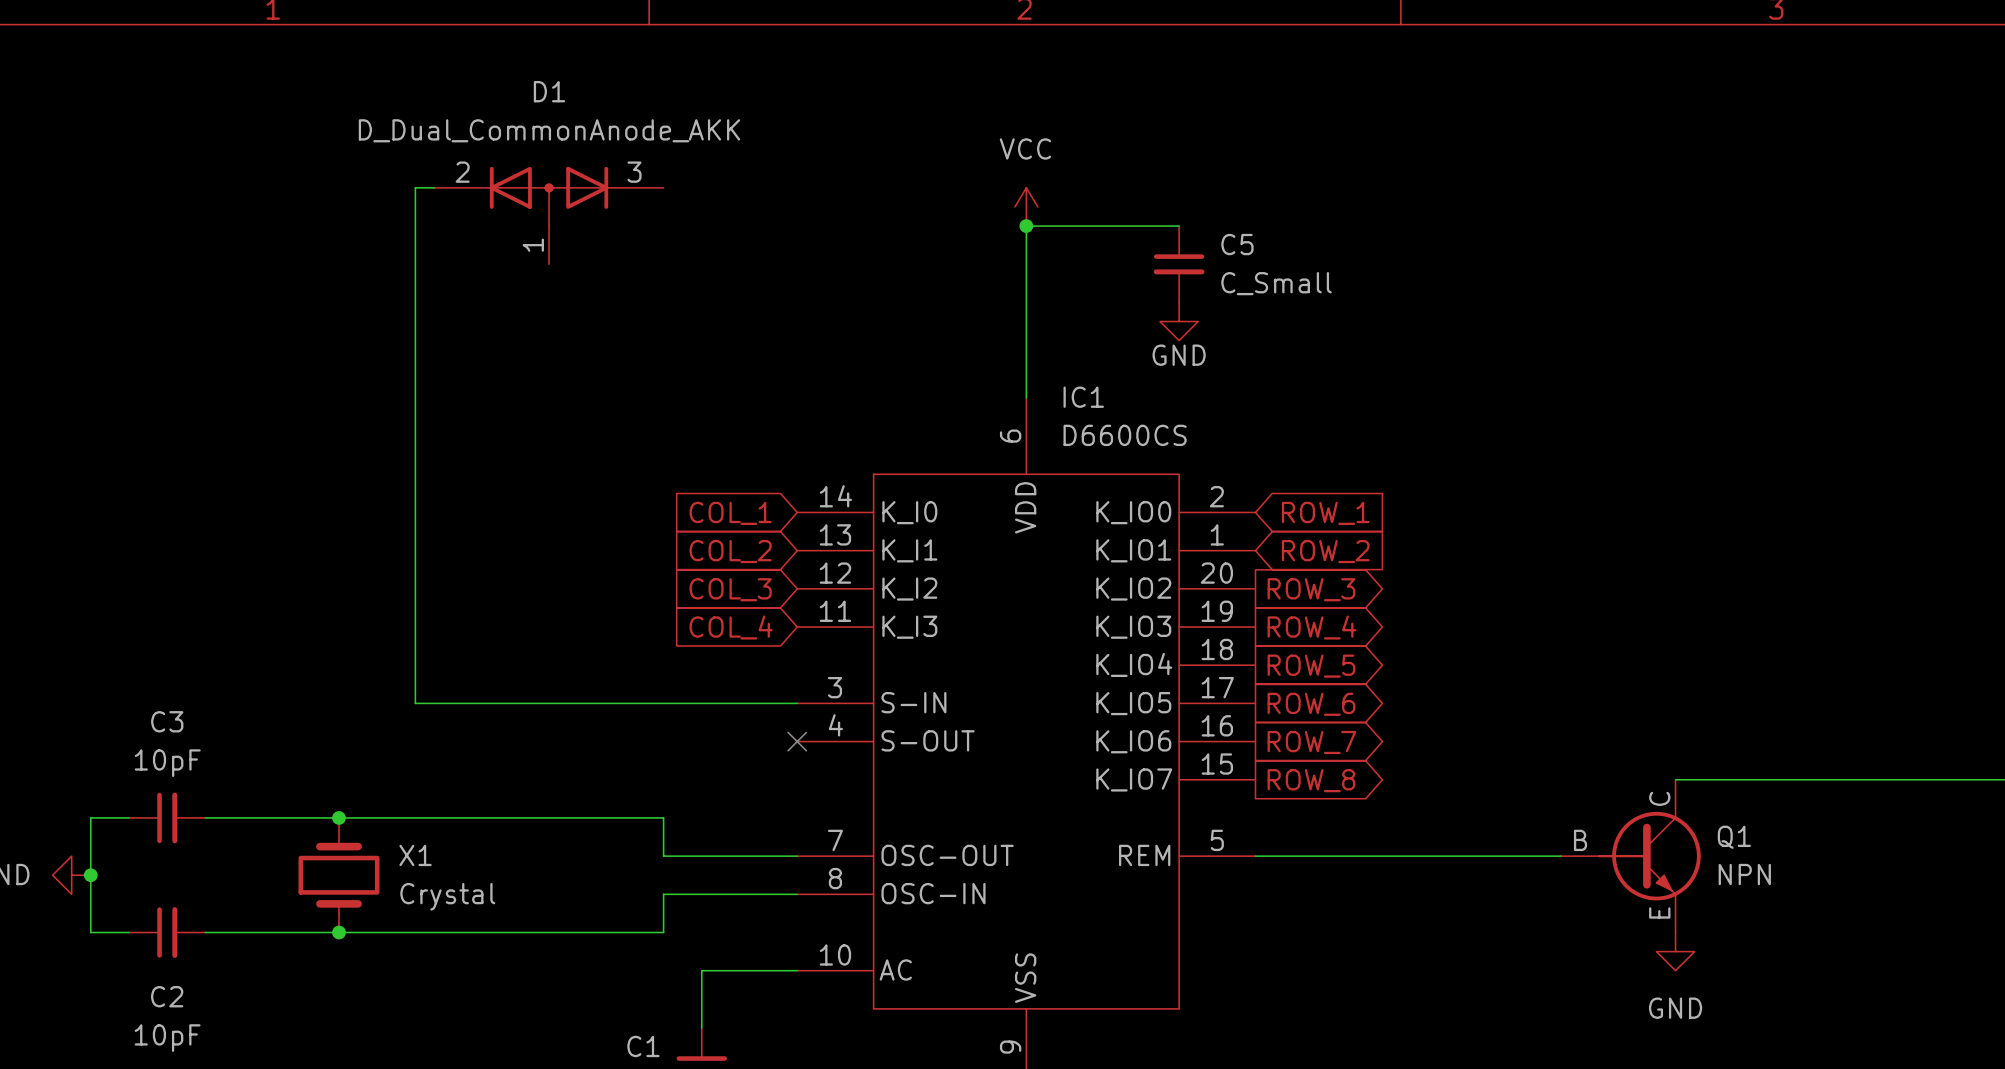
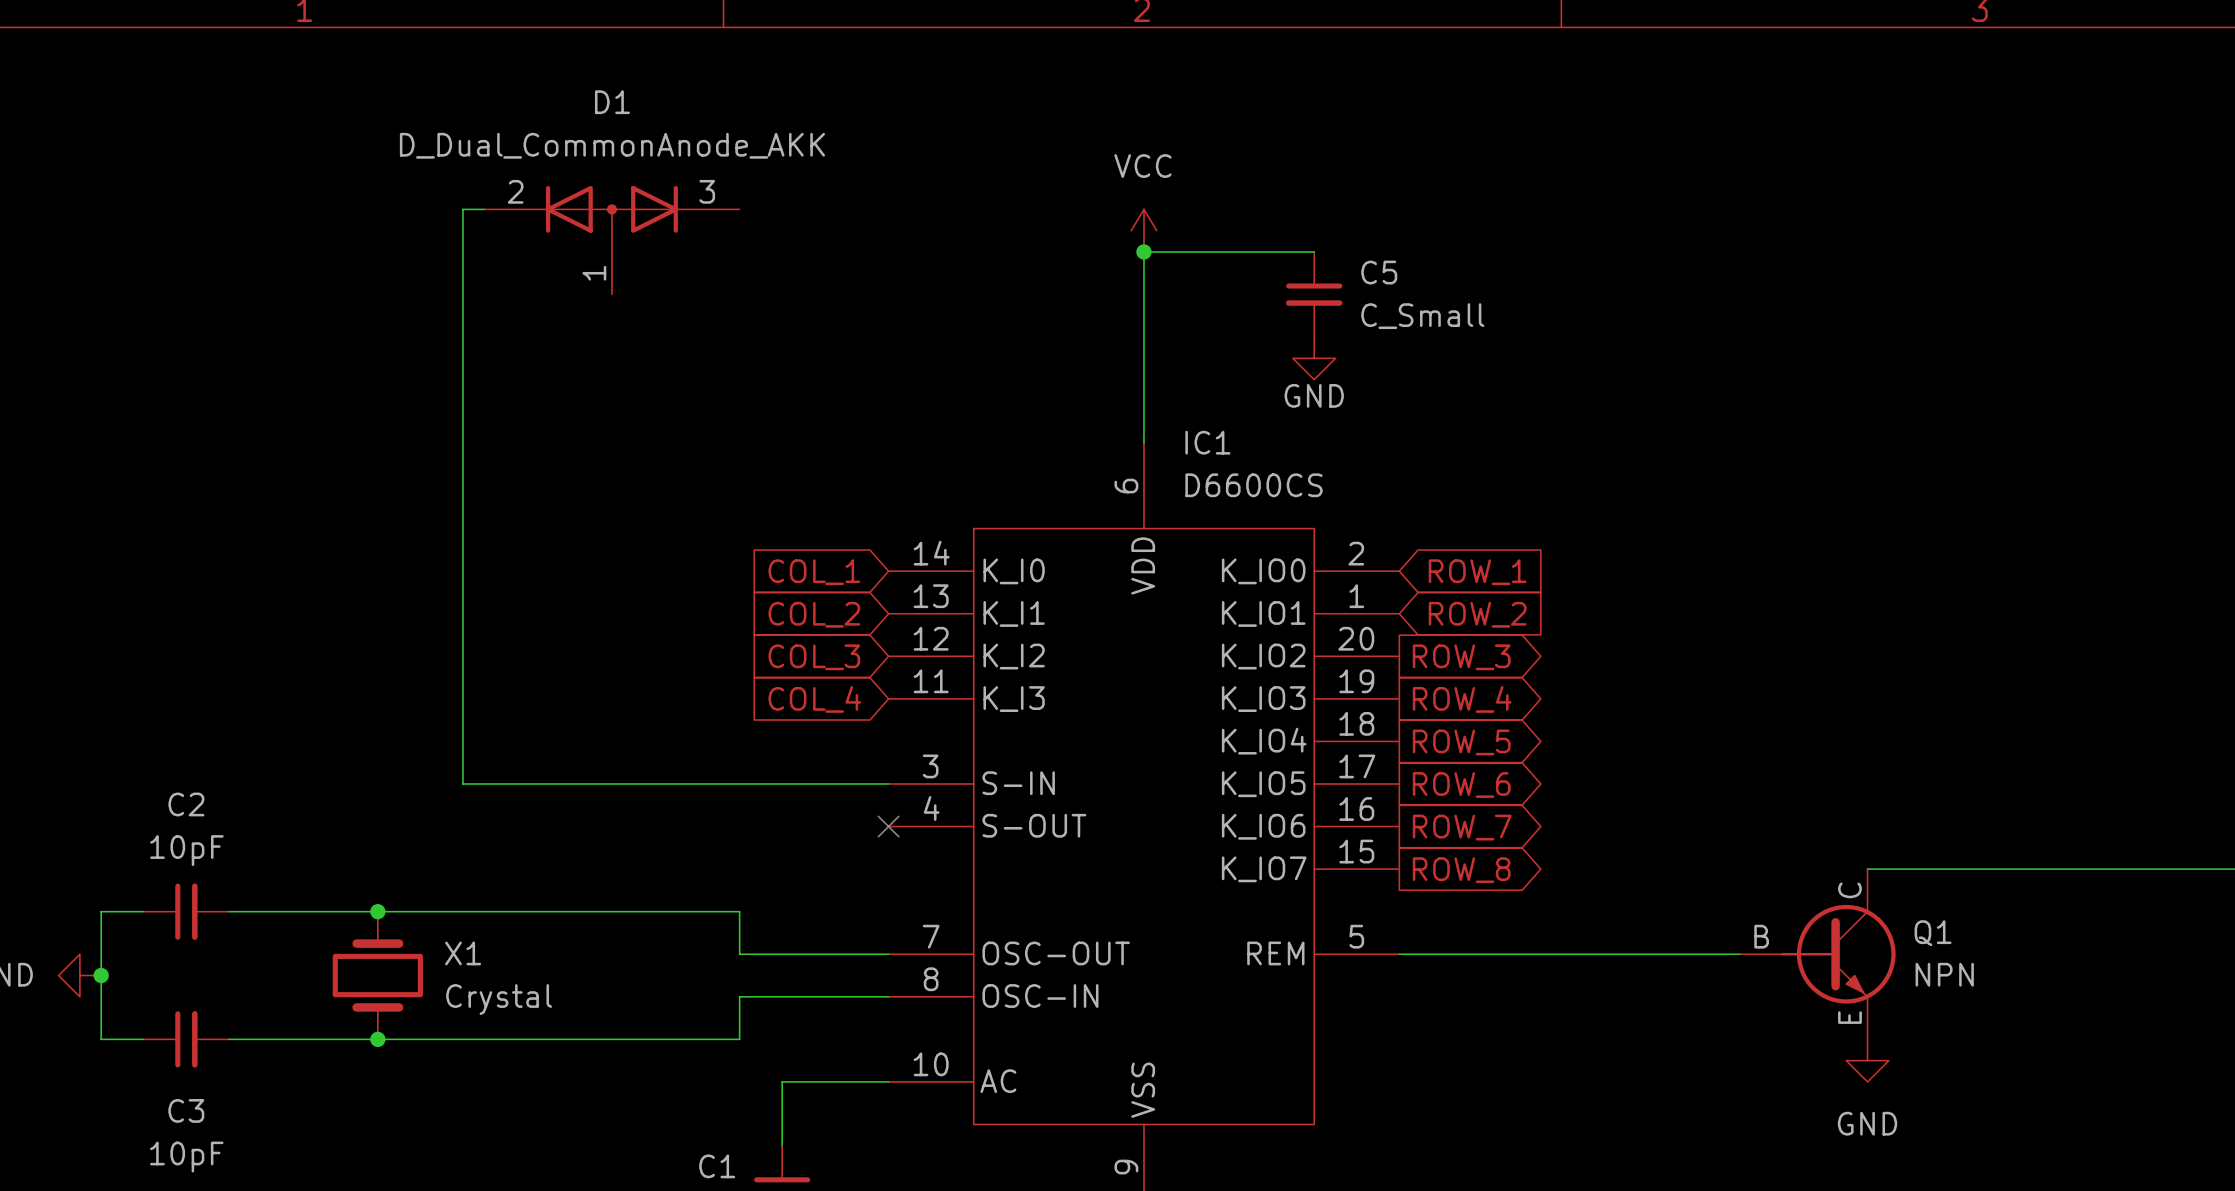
C3 name: C3 (167, 721) -> C2 (186, 804)
C2 name: C2 (167, 996) -> C3 (186, 1110)

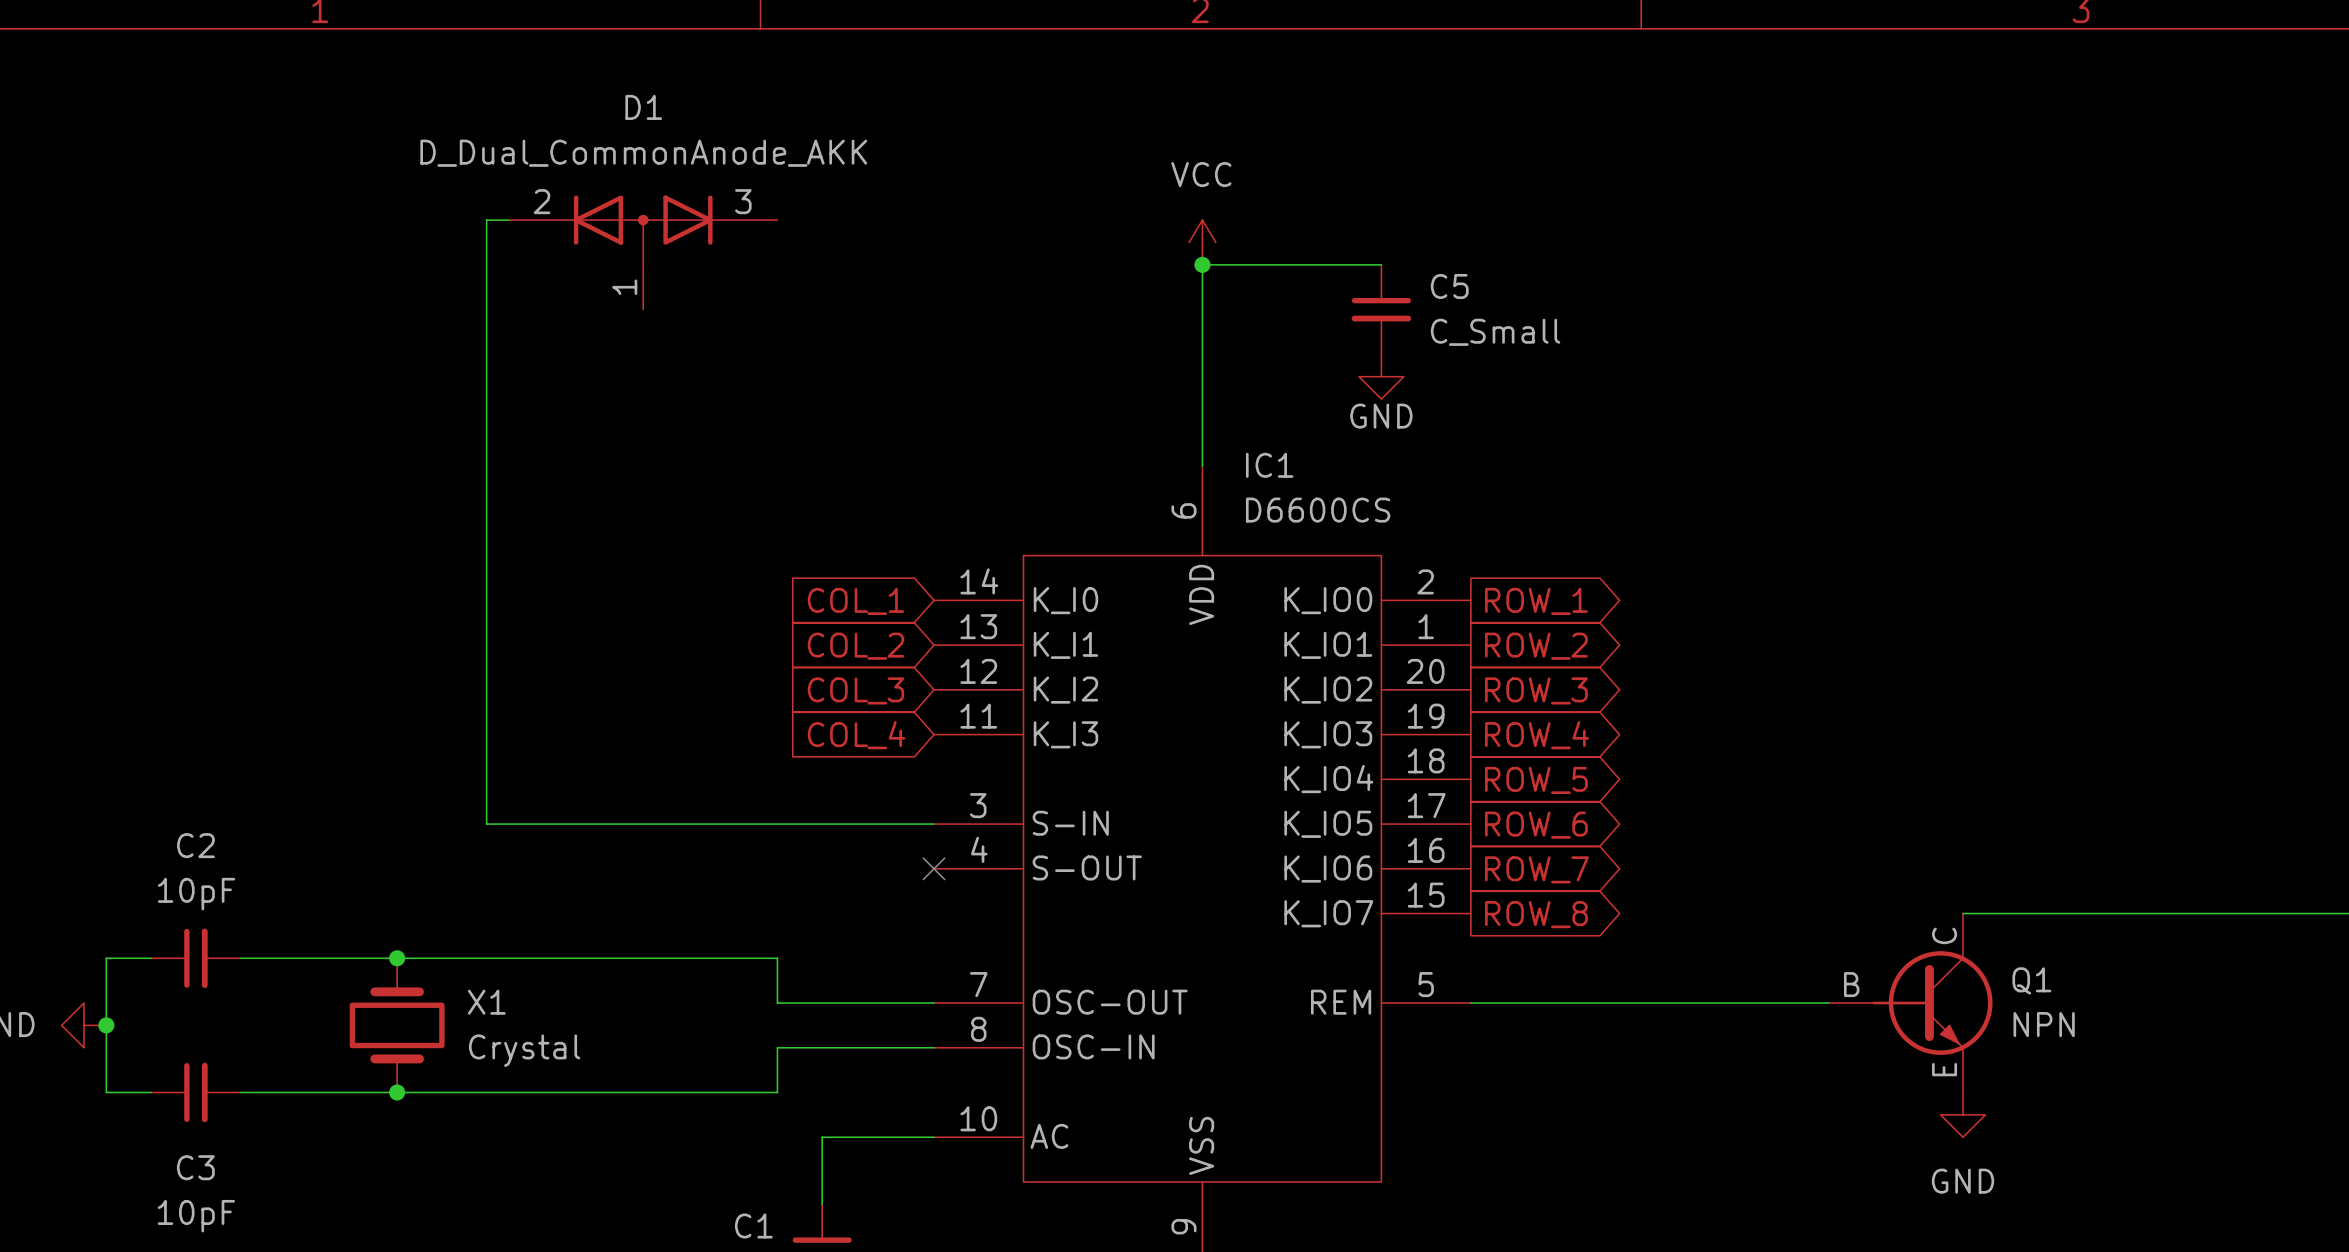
global label shape: input (1477, 572) -> output (1536, 601)
global label shape: input (1477, 614) -> output (1536, 646)

